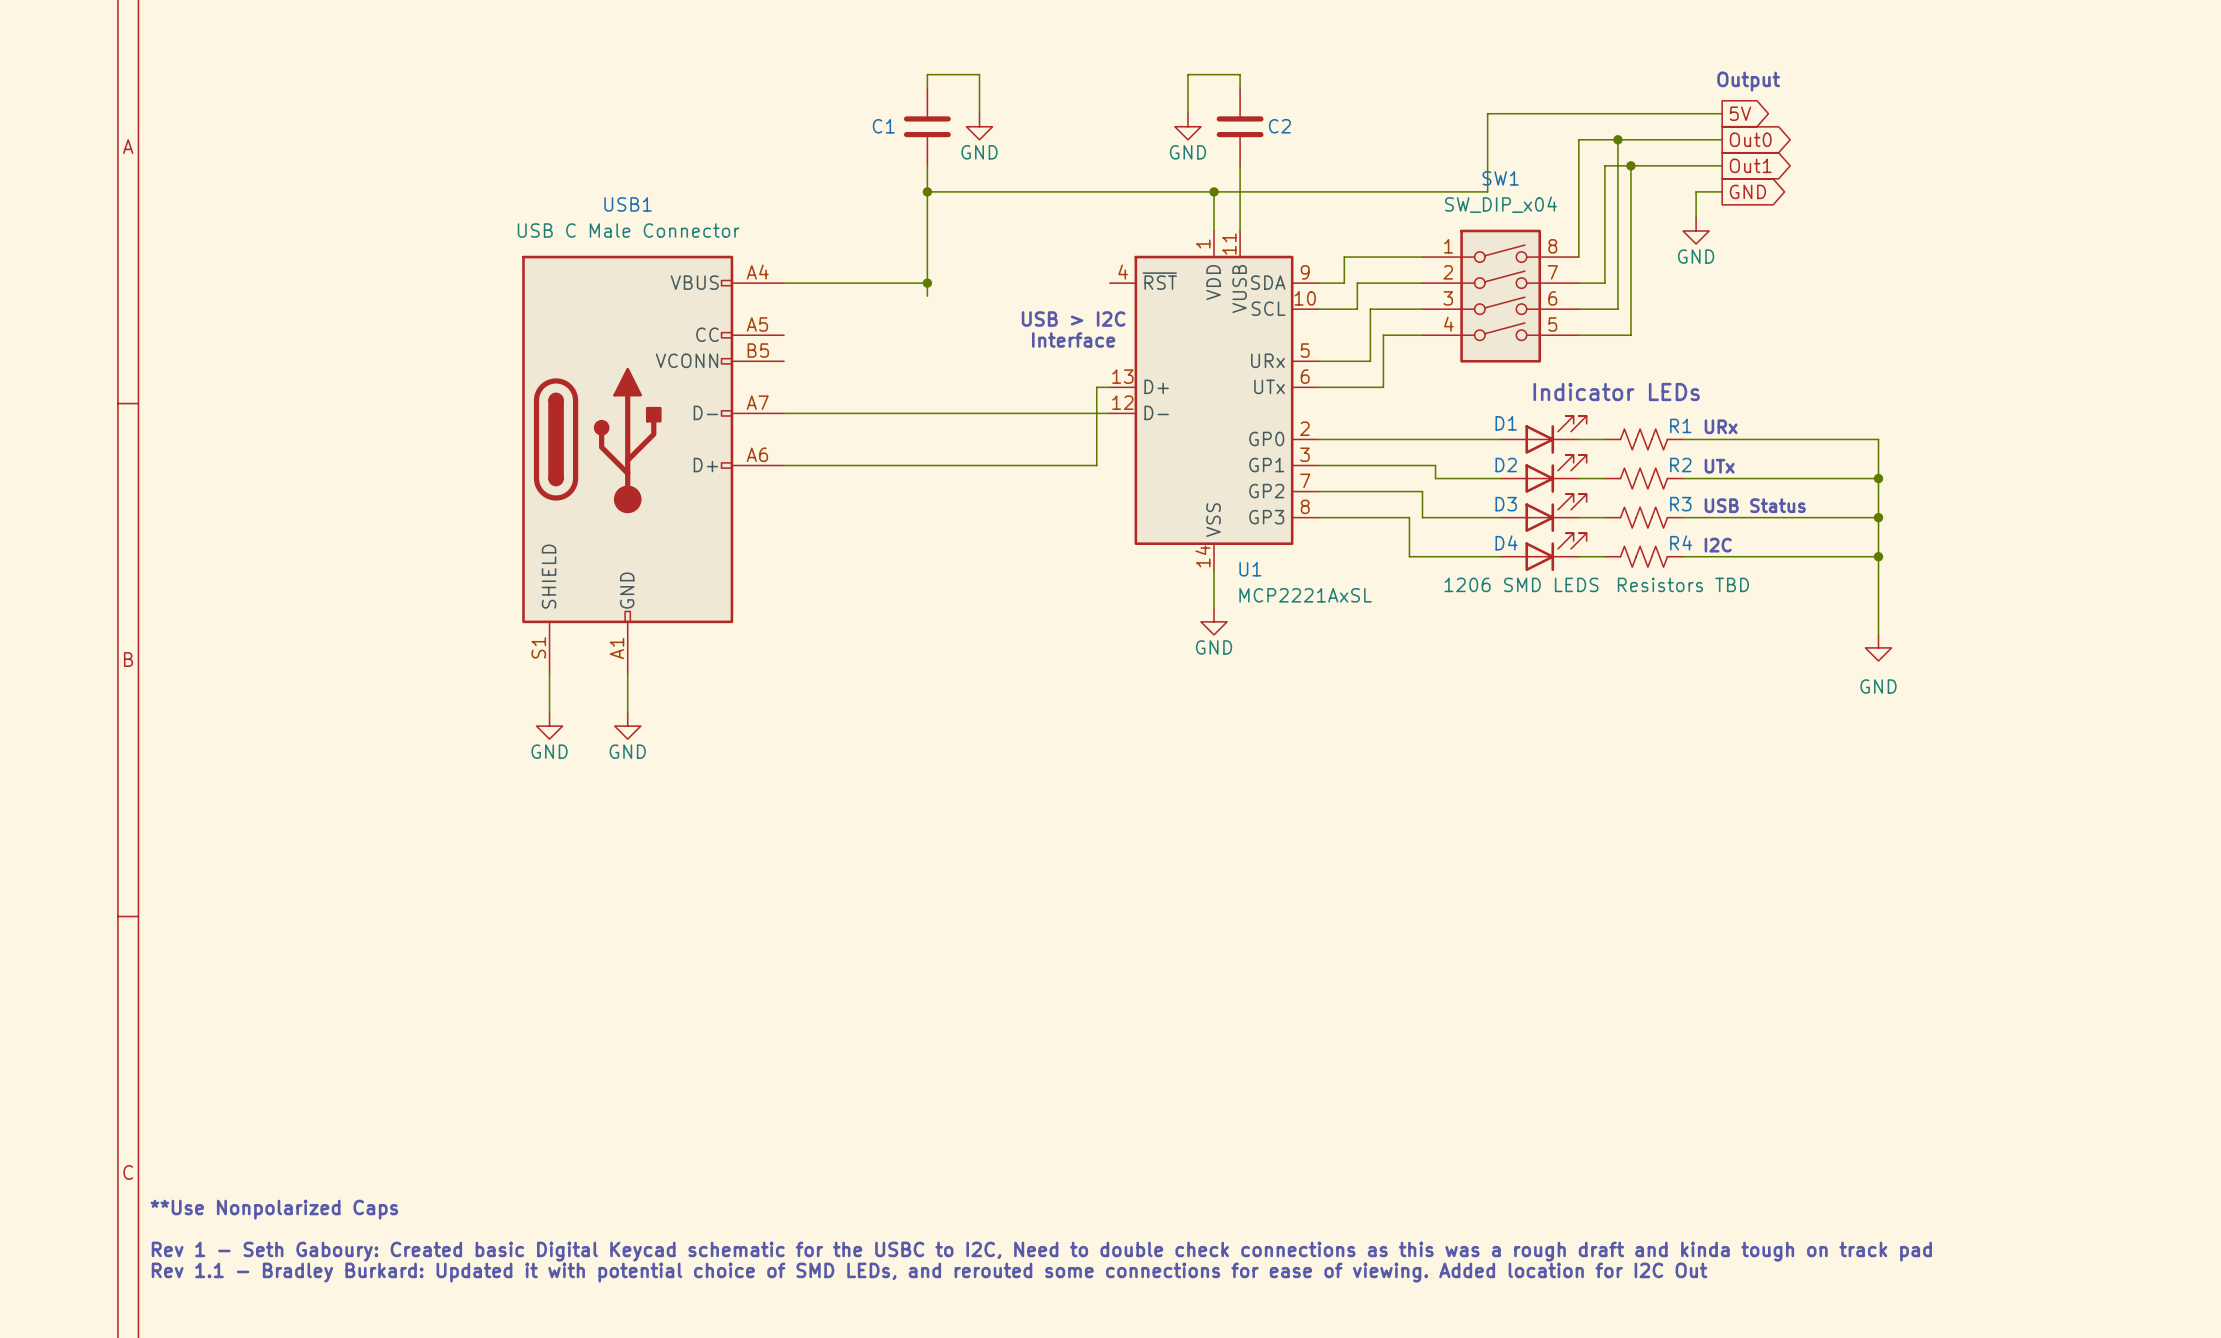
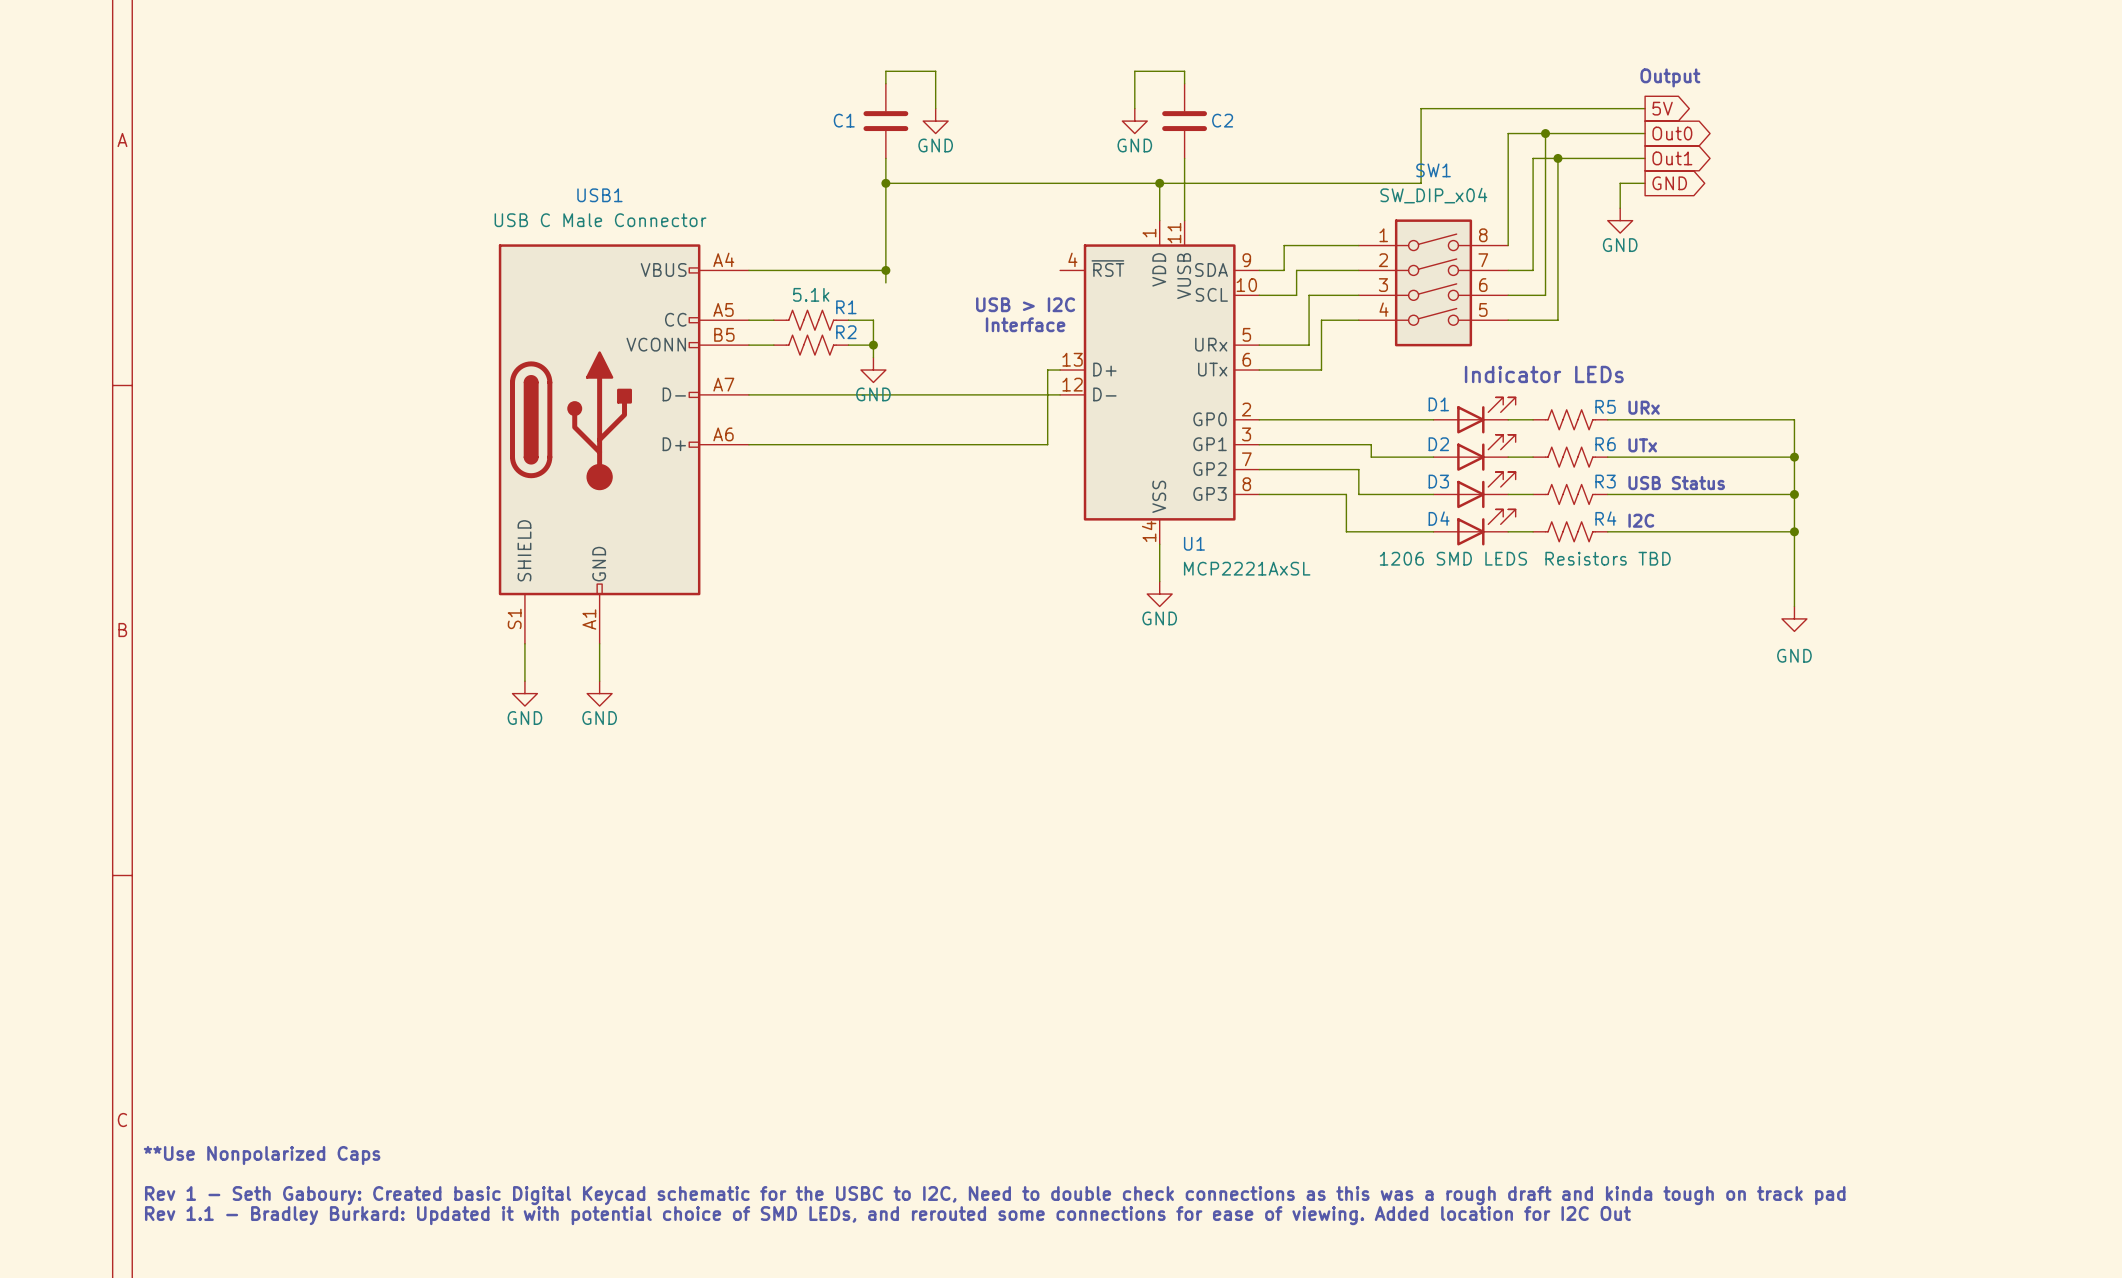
wire: none -> (748, 320) (773, 320)
R1: none -> 5.1k (811, 320)
wire: none -> (848, 320) (873, 320) (873, 357)
wire: none -> (748, 345) (773, 345)
R2: none -> (811, 345)
wire: none -> (848, 345) (873, 345)
junction: none -> (873, 345)
power symbol: none -> GND (873, 370)
R1 name: R1 (1680, 425) -> R5 (1605, 406)
R2 name: R2 (1680, 465) -> R6 (1605, 444)

